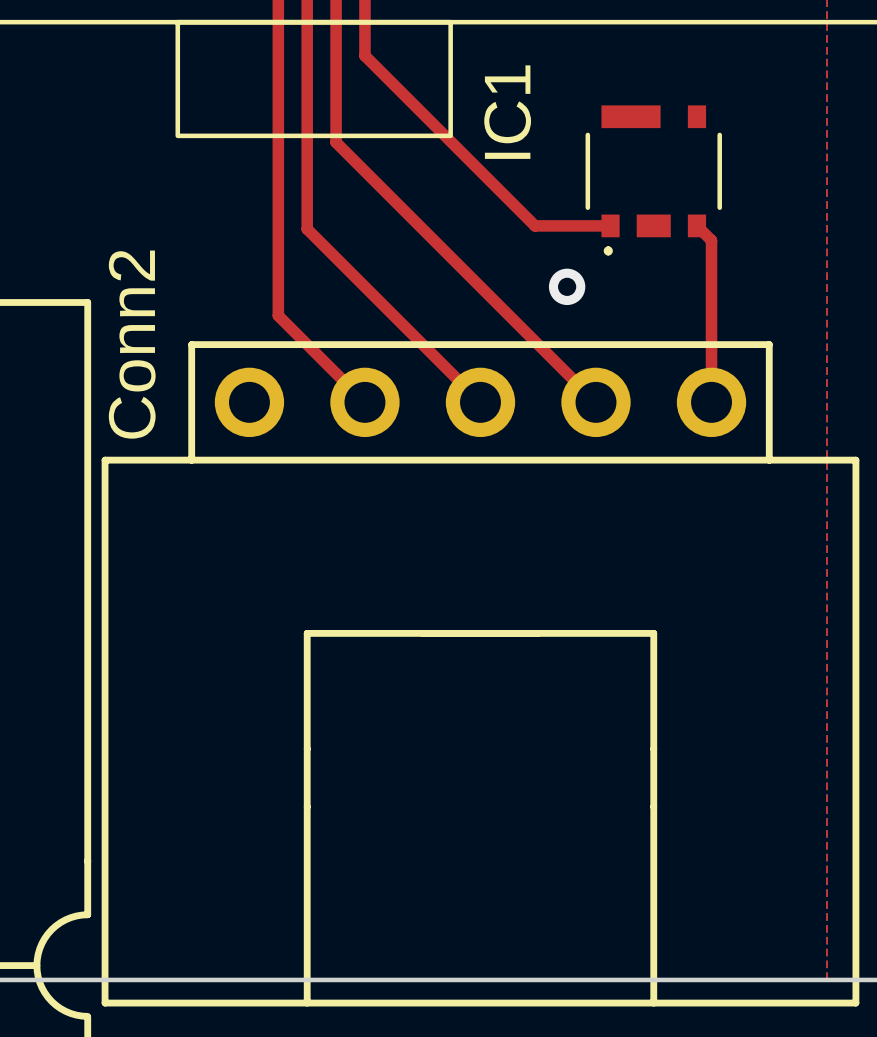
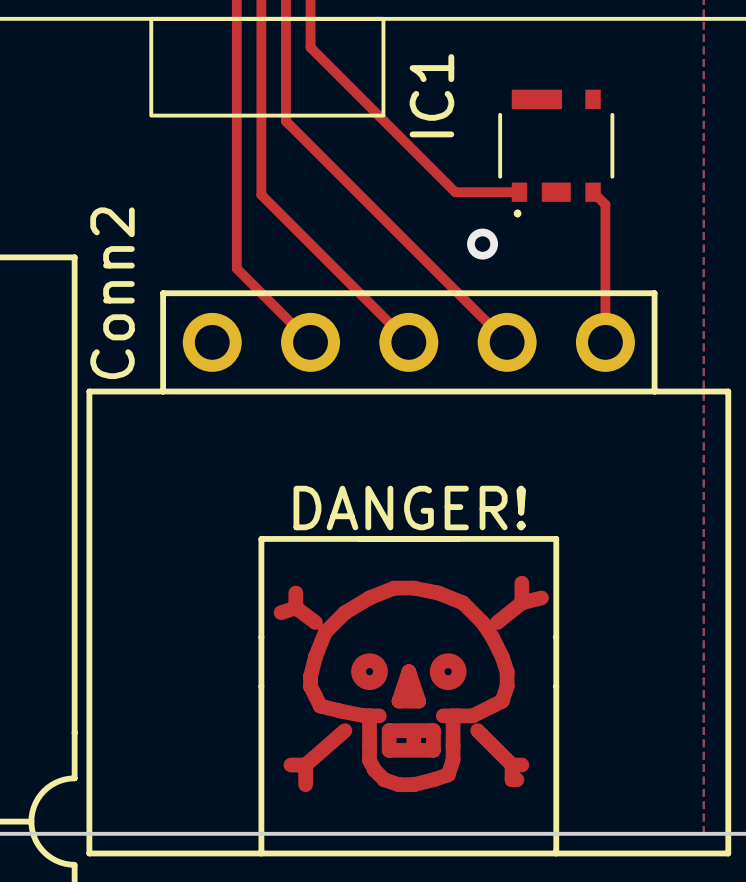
DANGER!: none -> (411, 683)

